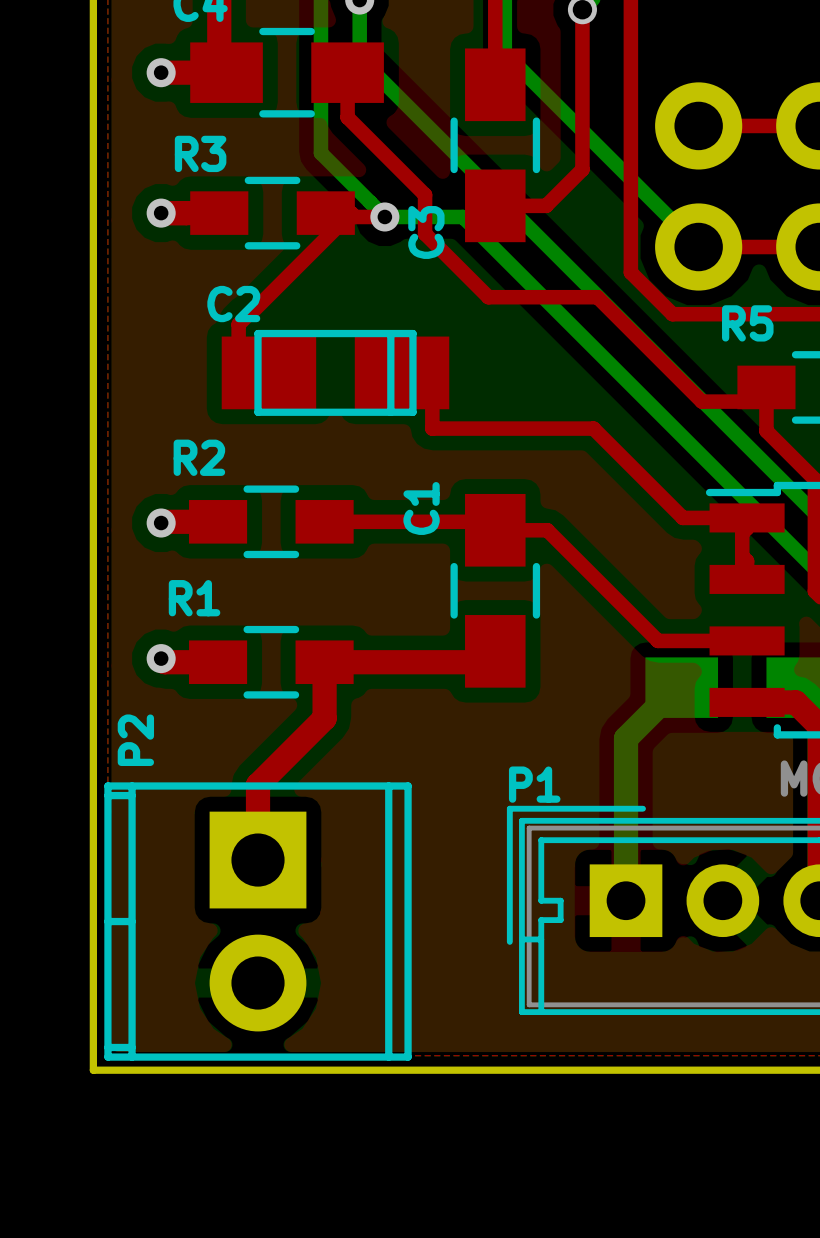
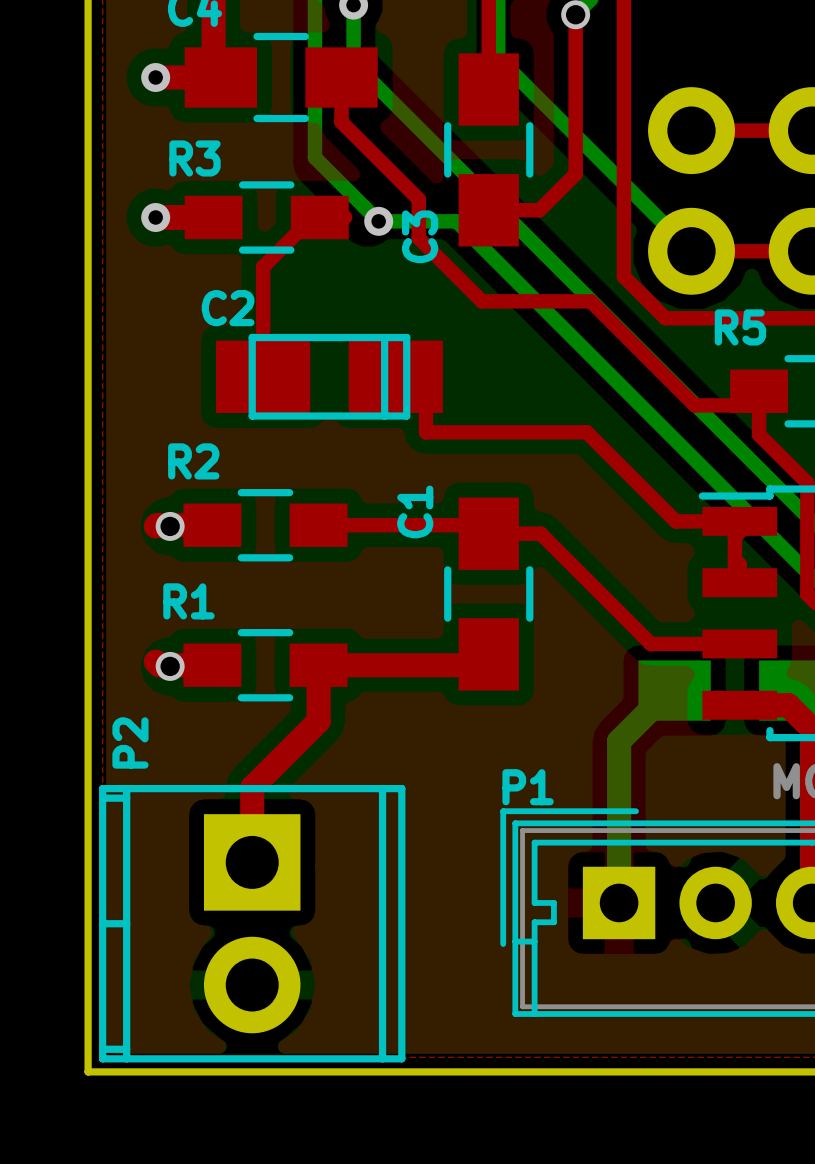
top track: none -> (319, 217) (312, 217) (263, 266) (263, 376)
top track: (384, 216) (355, 216) (351, 213) (238, 324) (238, 368) -> none
via position: (161, 523) -> (170, 526)
via position: (161, 658) -> (170, 666)

